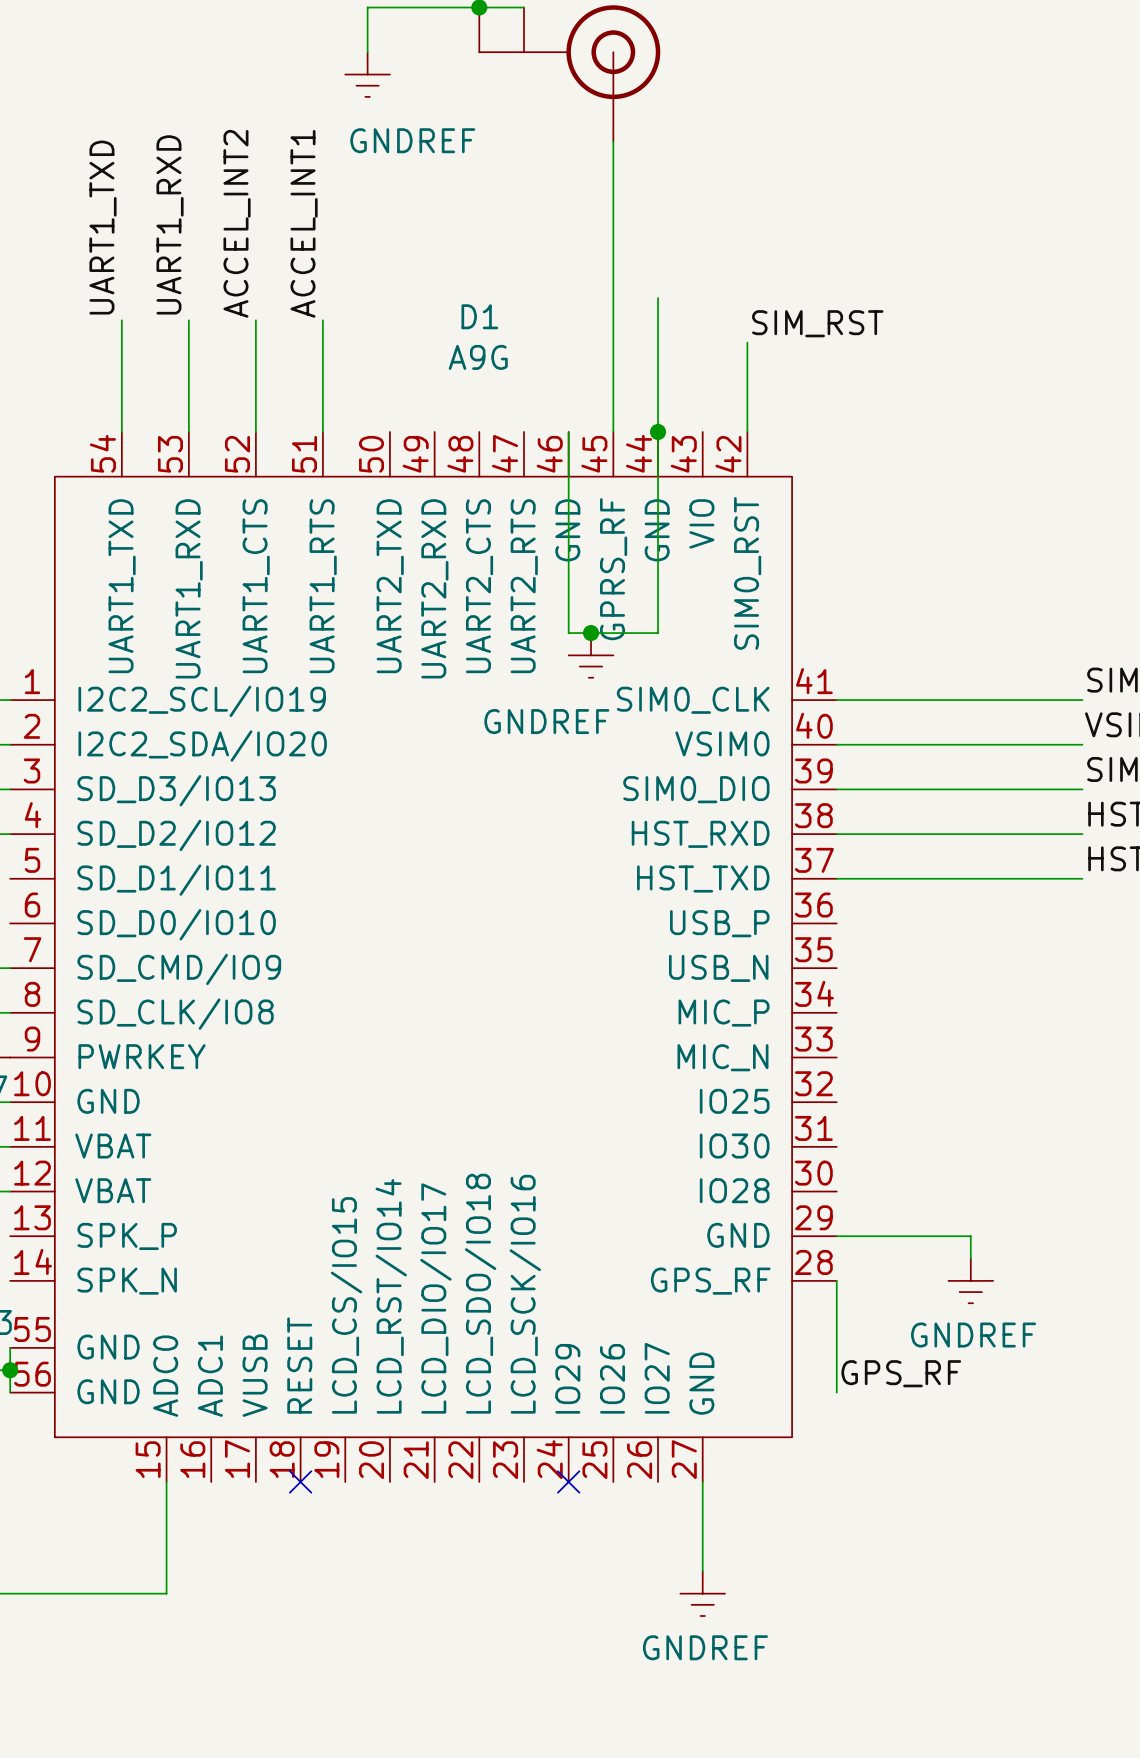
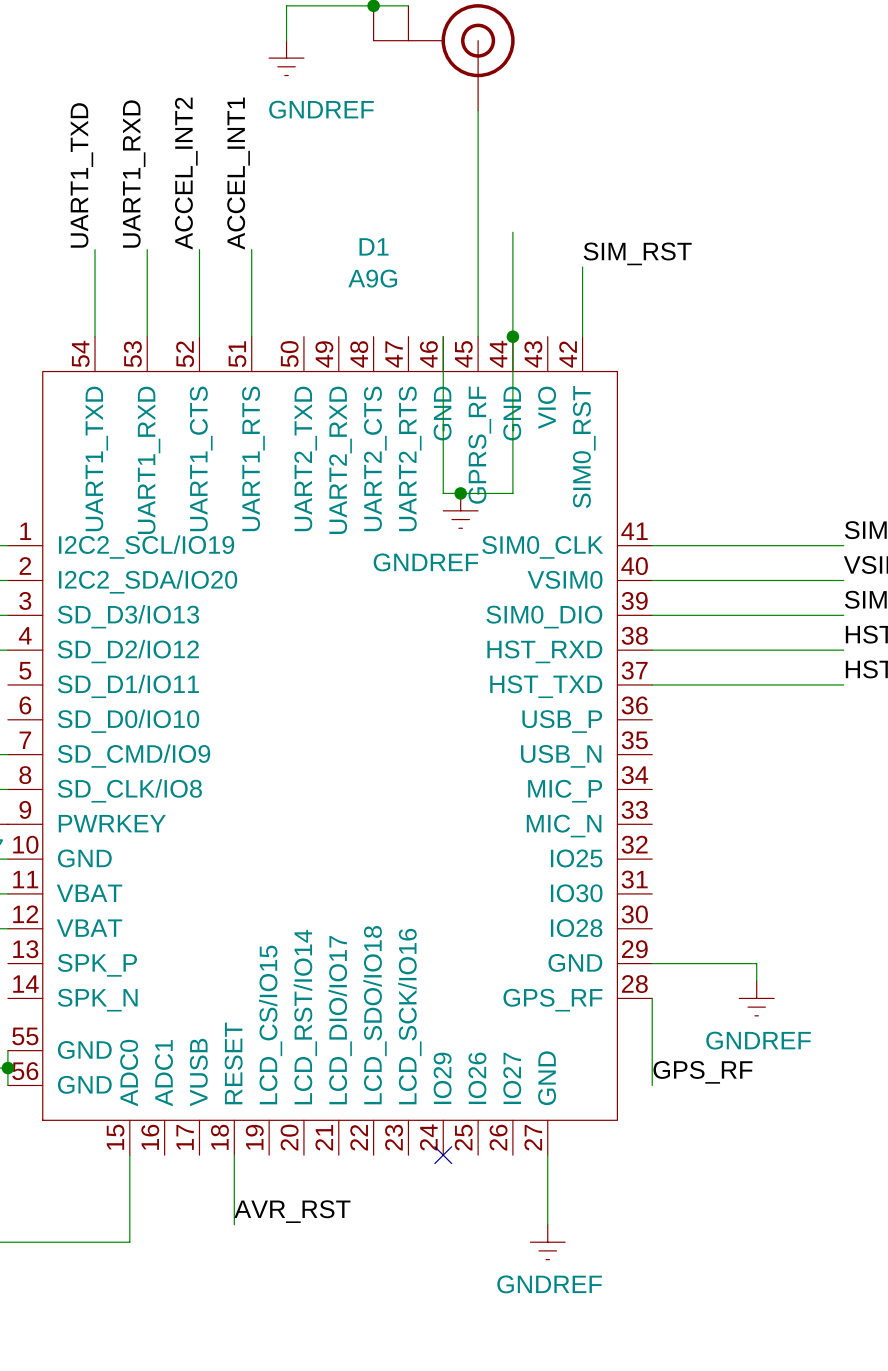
wire: none -> (234, 1155) (234, 1224)
no-connect mark: (300, 1481) -> none
label: none -> AVR_RST (292, 1211)

